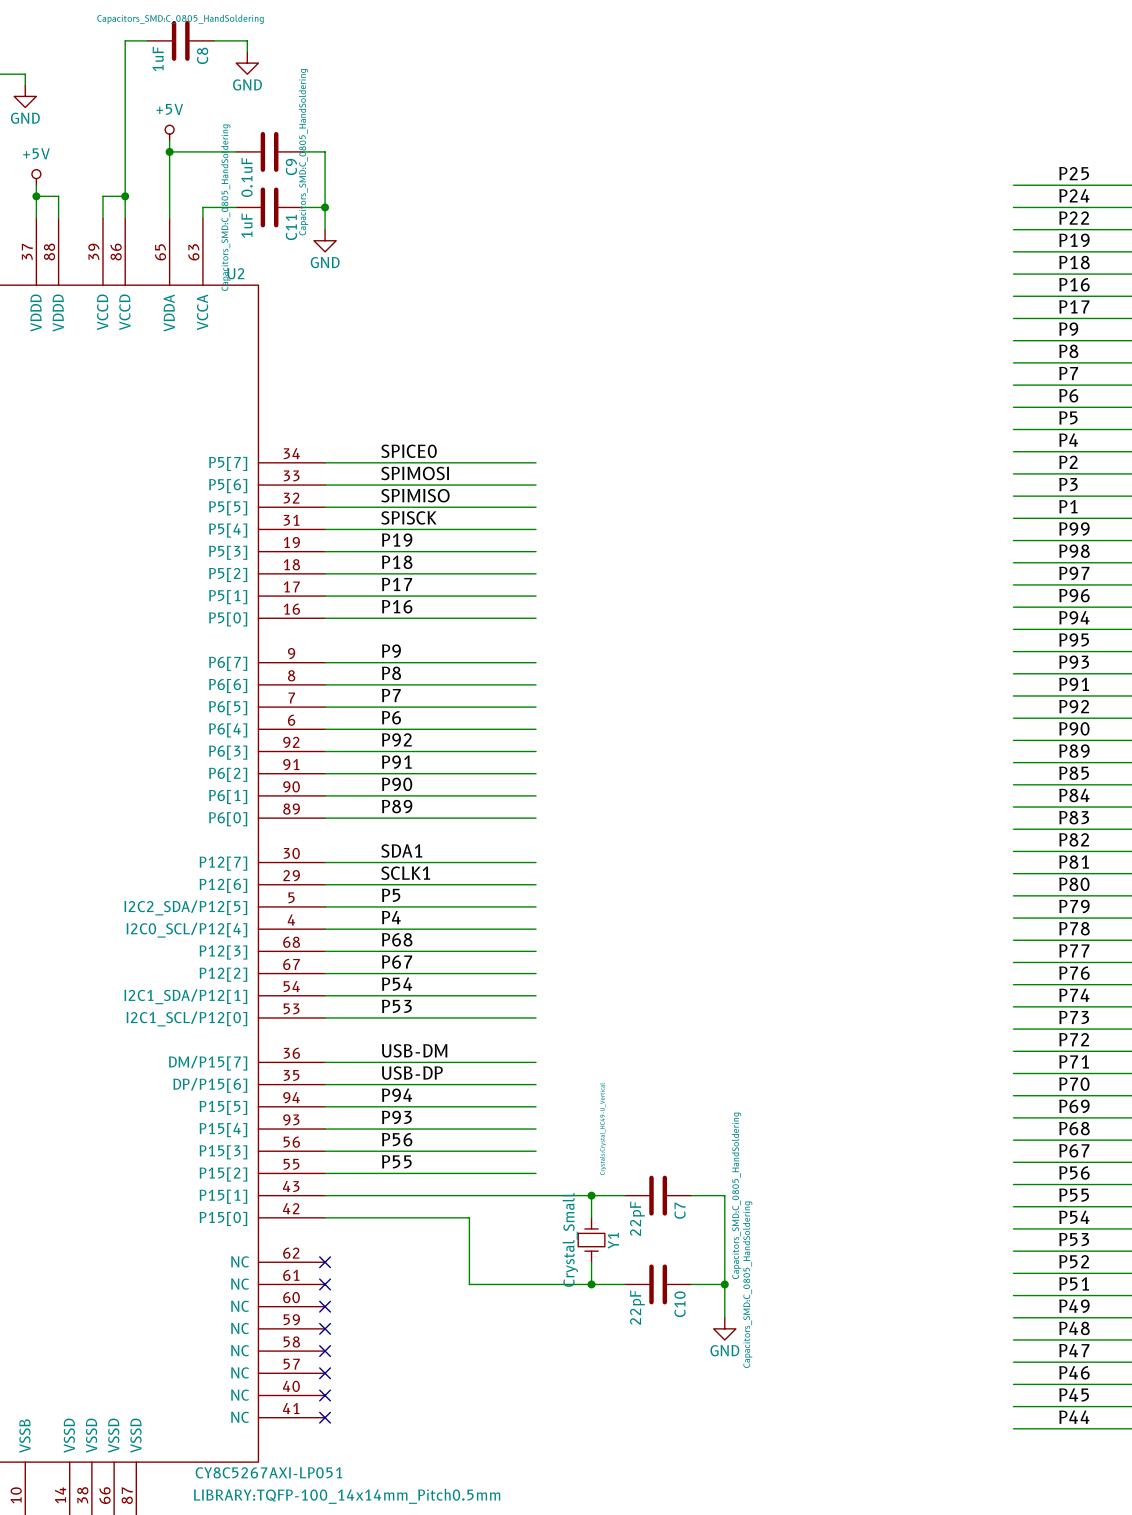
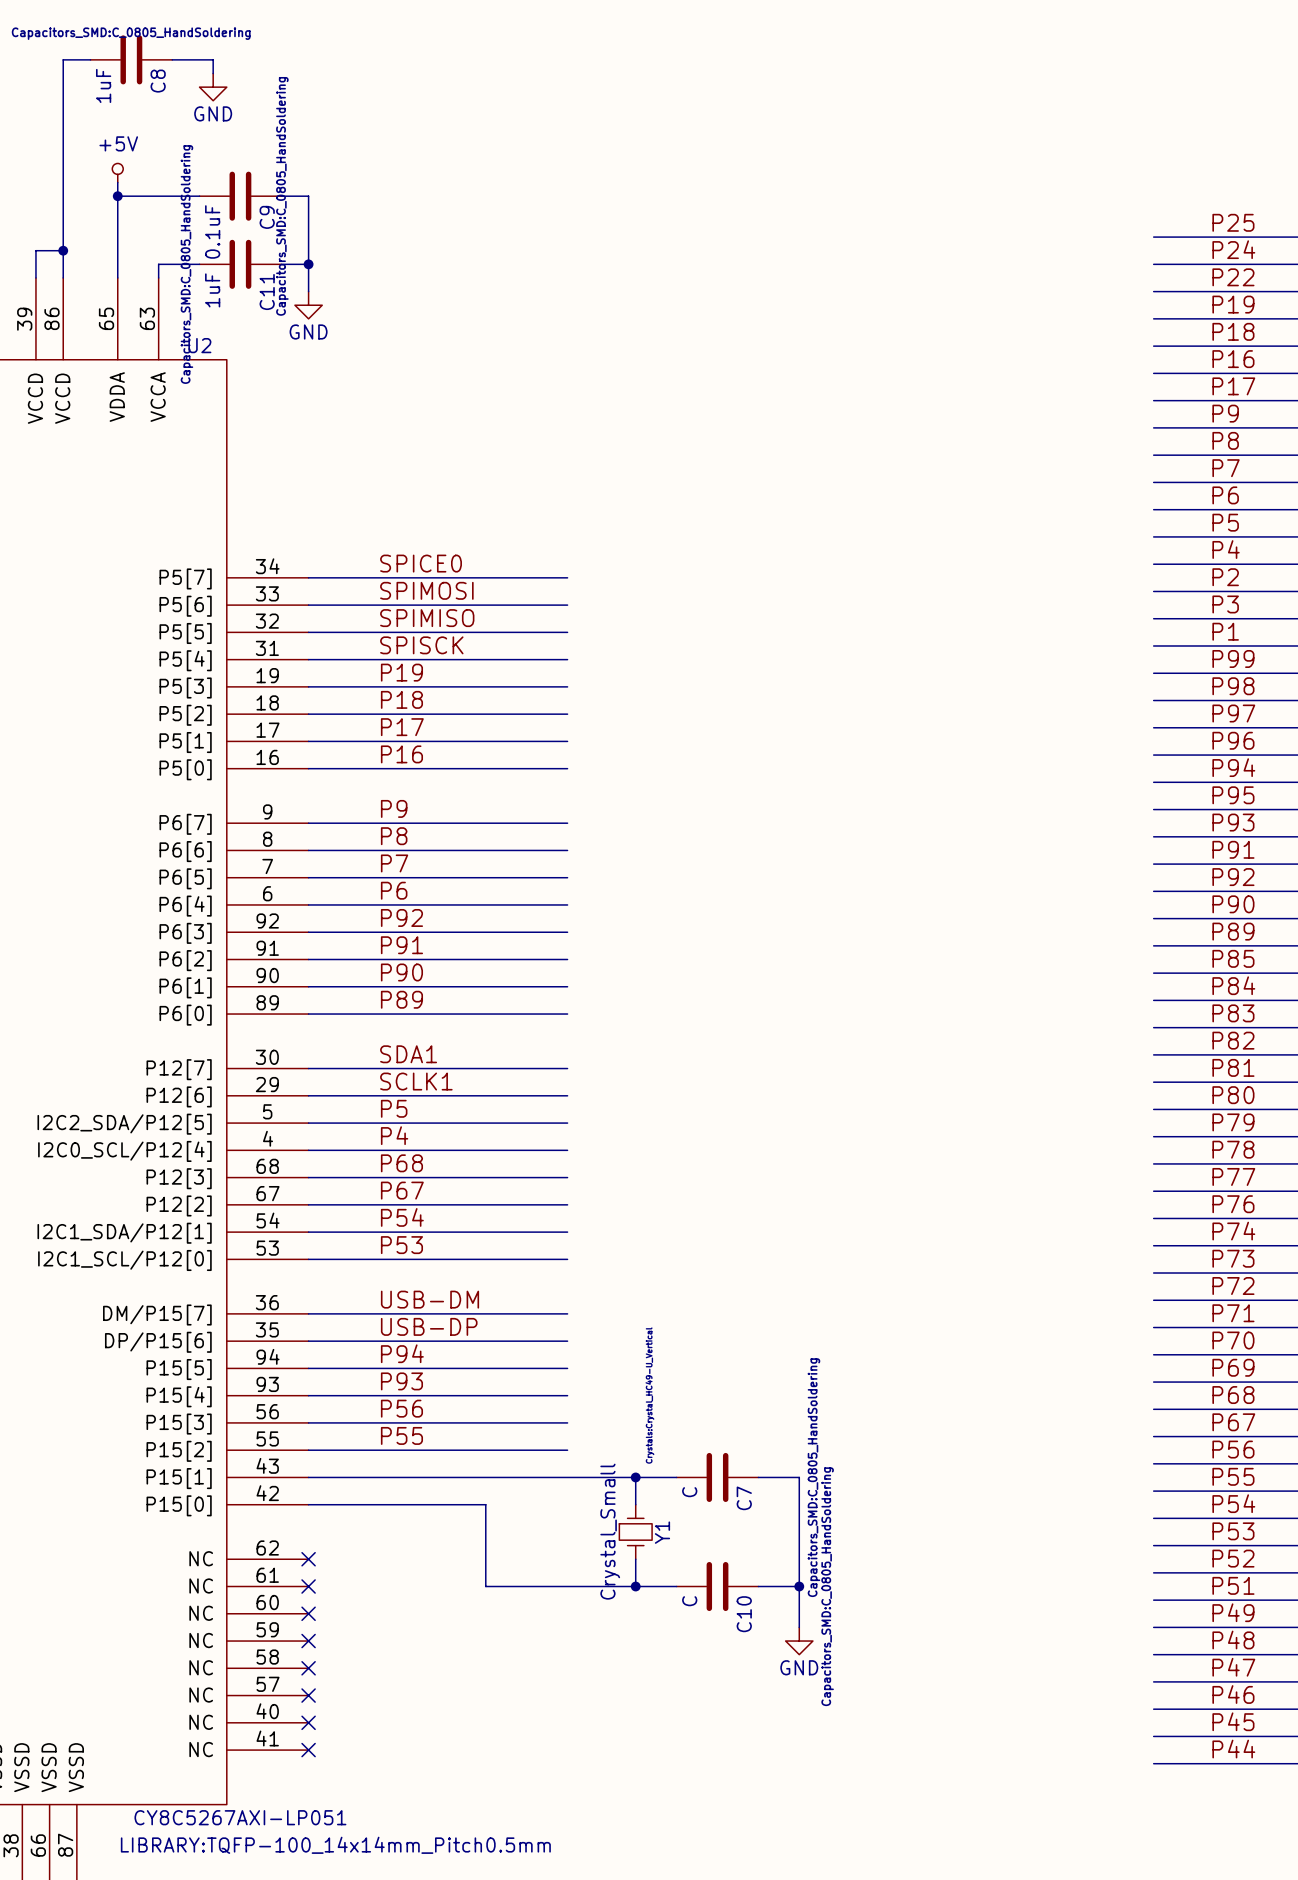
C7 value: 22pF (637, 1218) -> C (689, 1492)
C10 value: 22pF (637, 1307) -> C (689, 1601)

